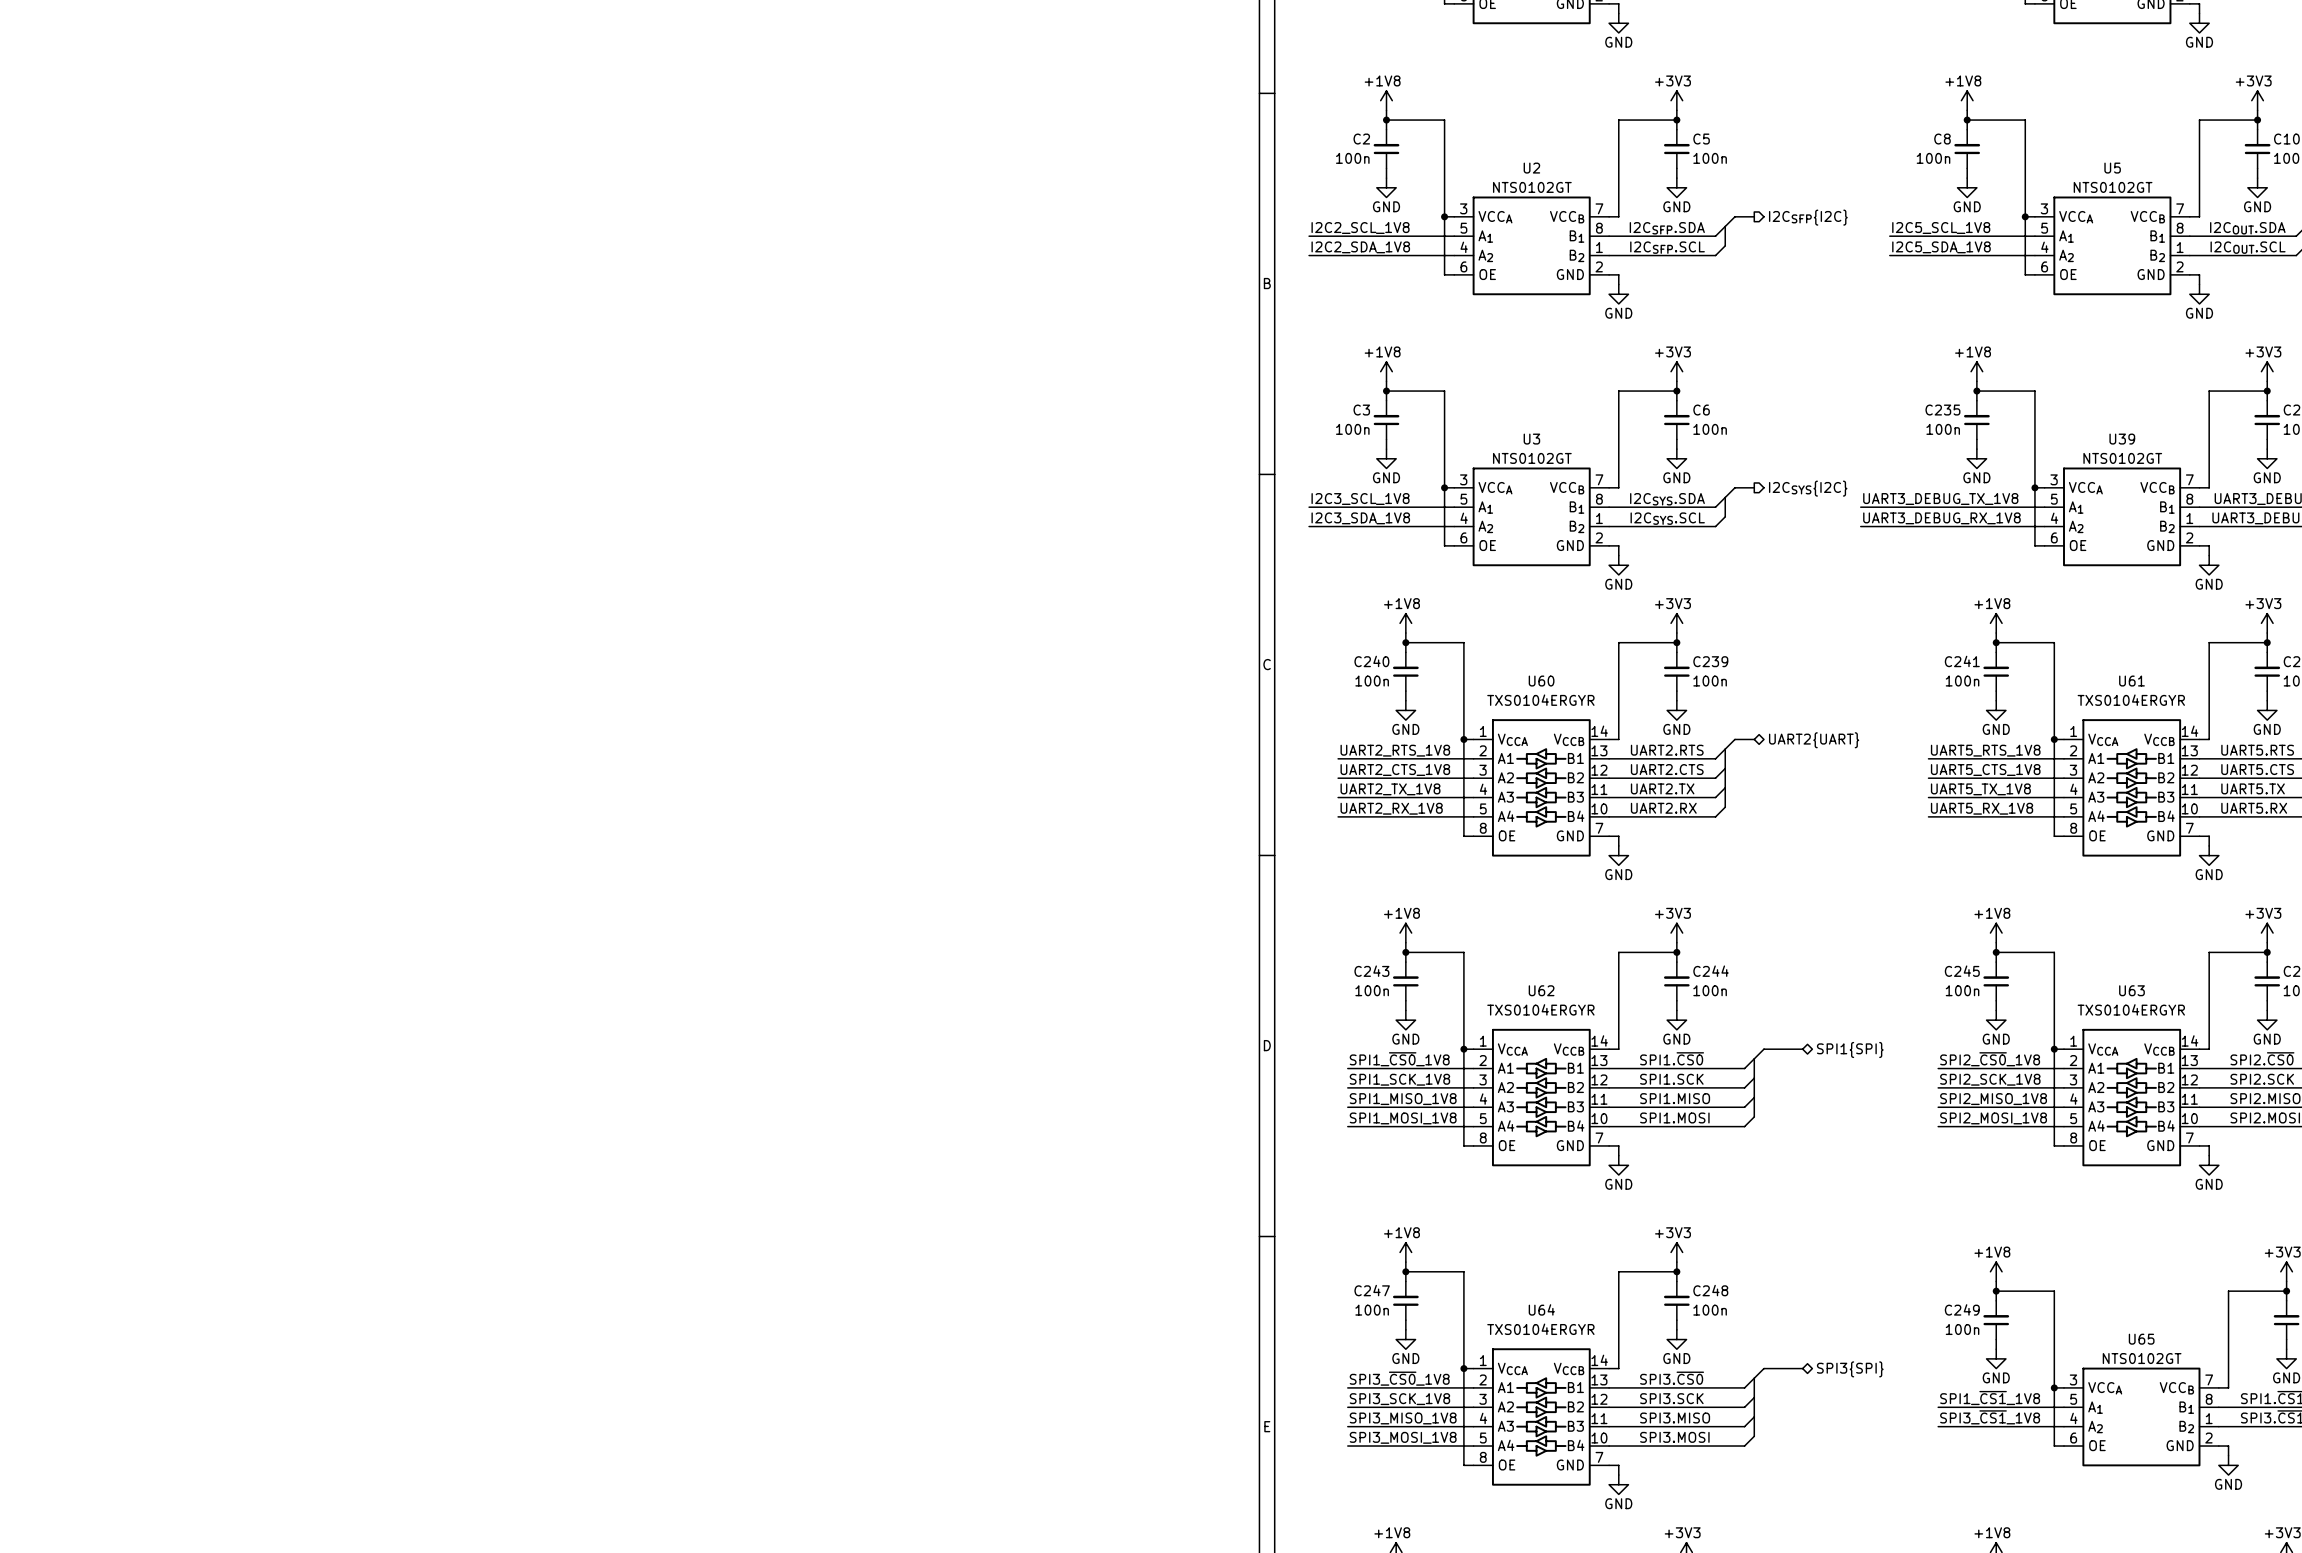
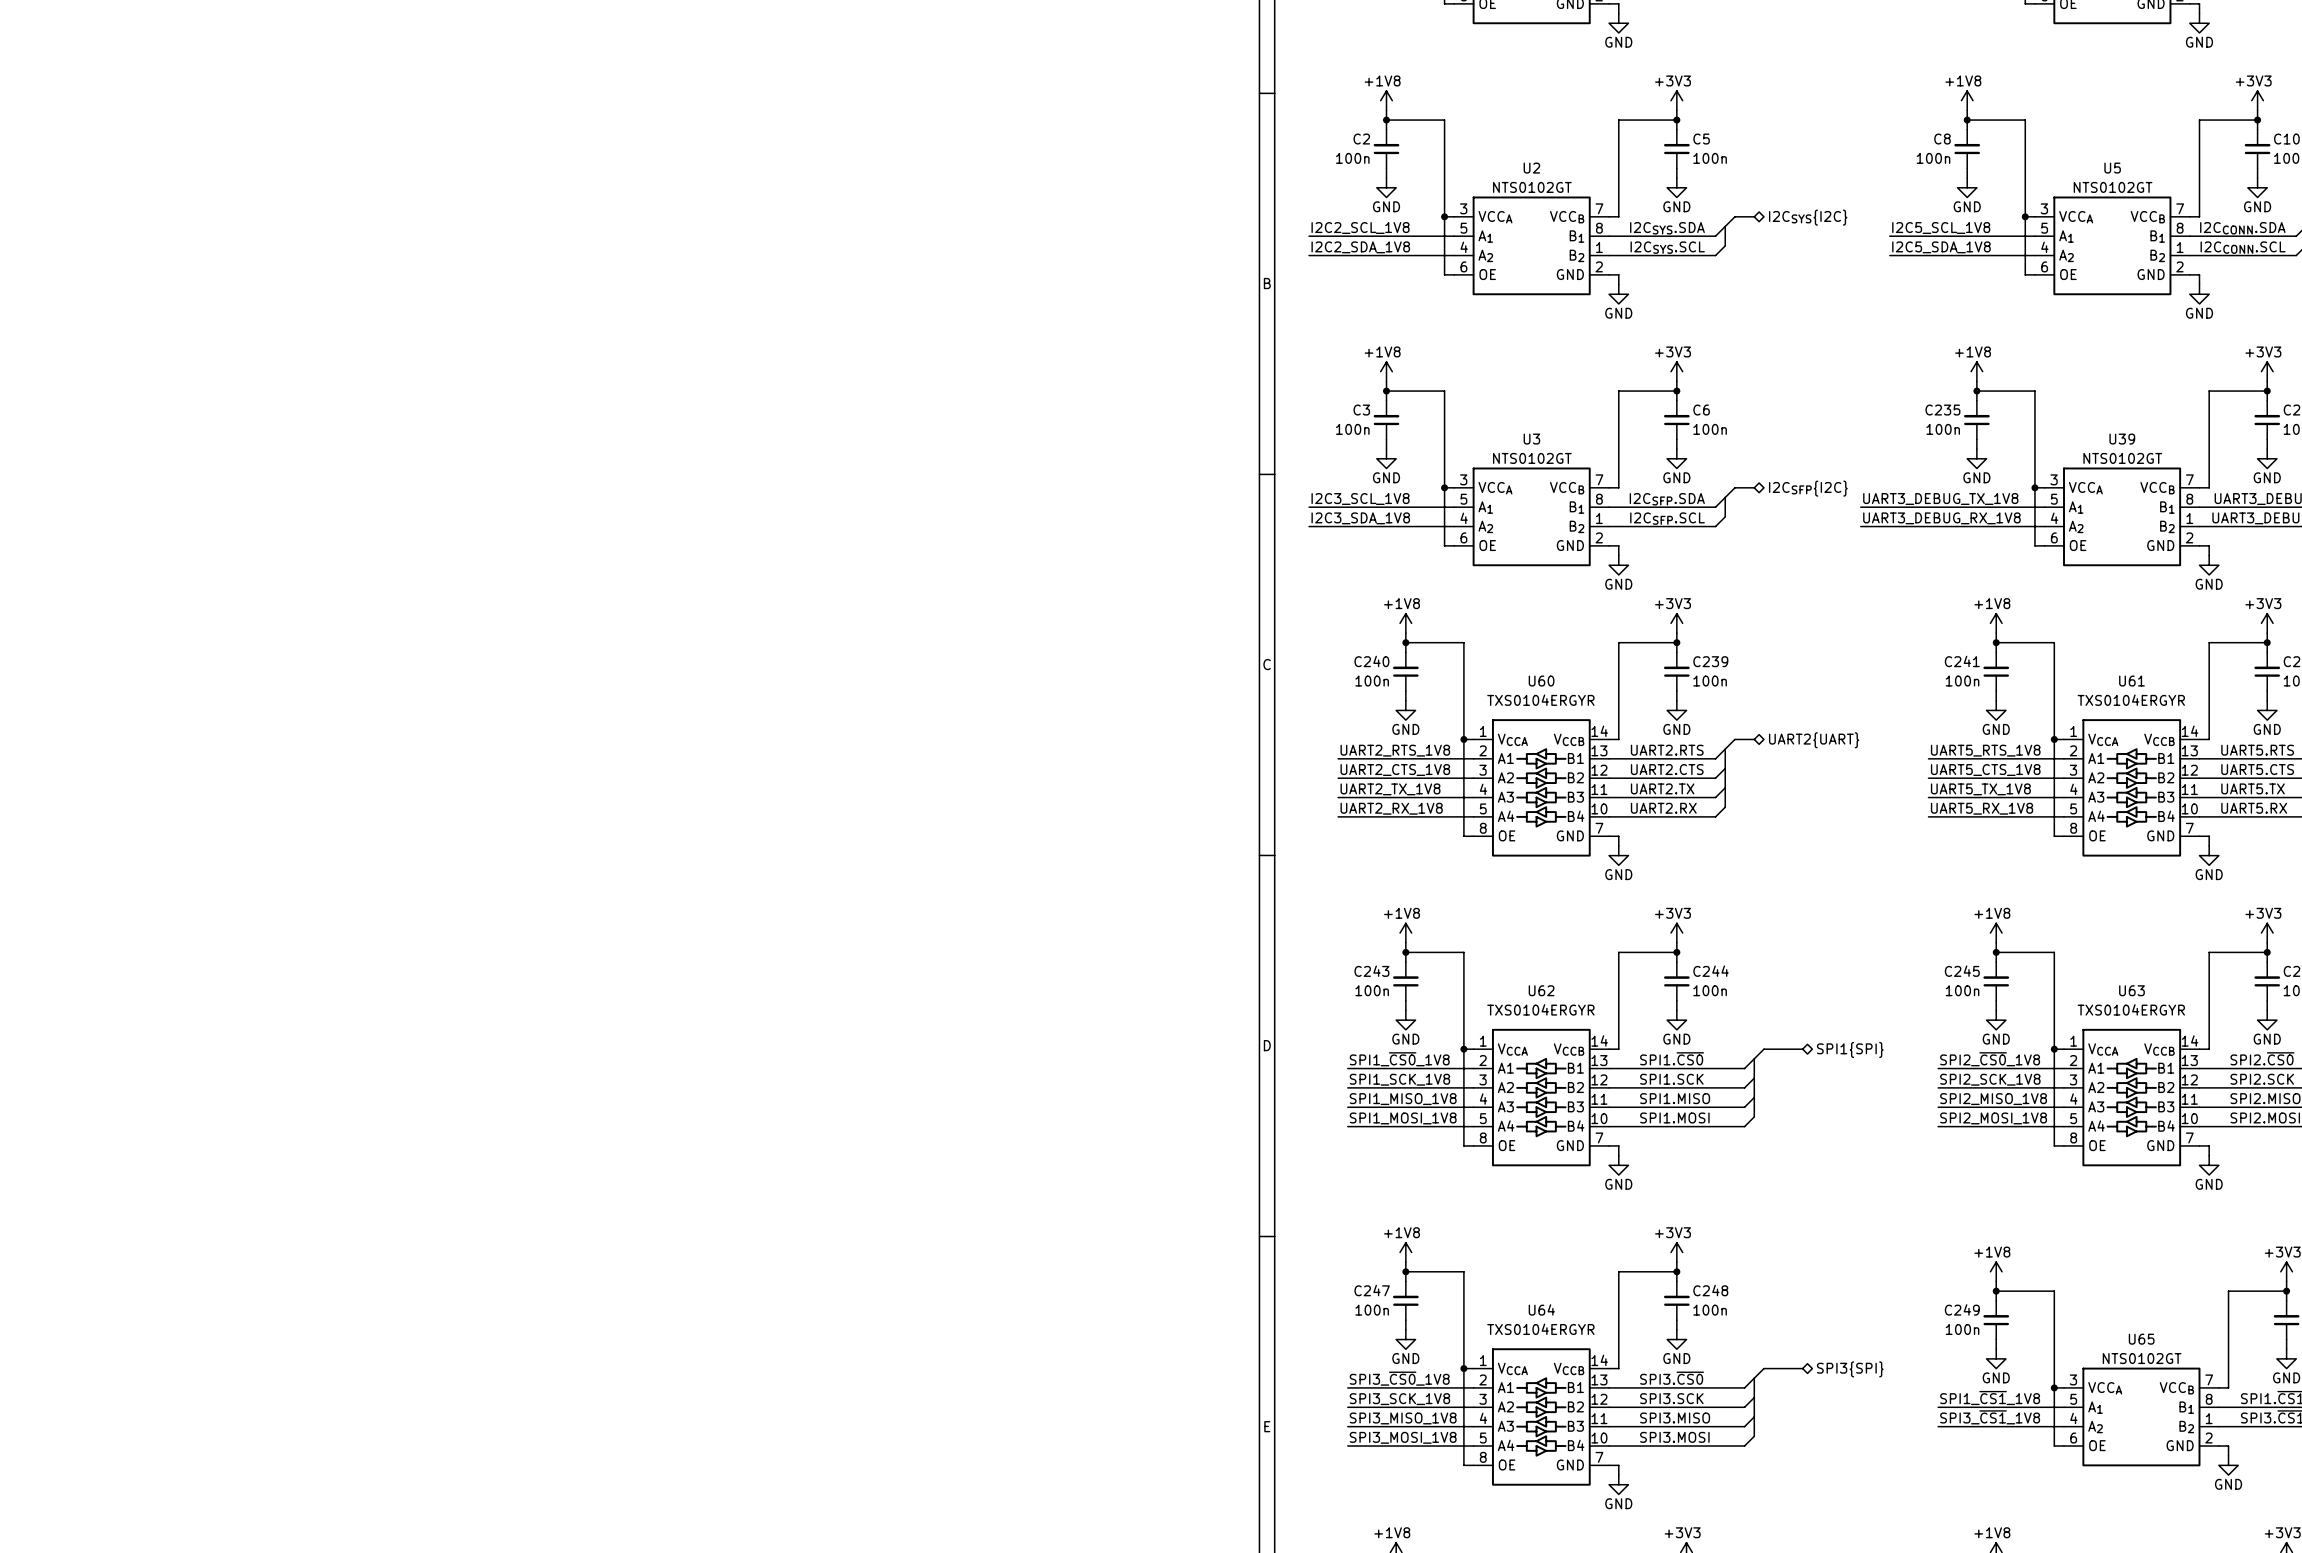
hierarchical label shape: output (1808, 217) -> bidirectional (1808, 217)
hierarchical label: I2CSFP{I2C} (1808, 217) -> I2CSYS{I2C} (1808, 217)
label: I2CSFP.SDA (1667, 228) -> I2CSYS.SDA (1667, 228)
label: I2COUT.SDA (2247, 228) -> I2CCONN.SDA (2242, 228)
label: I2CSFP.SCL (1667, 247) -> I2CSYS.SCL (1667, 247)
label: I2COUT.SCL (2248, 247) -> I2CCONN.SCL (2243, 247)
hierarchical label shape: output (1808, 488) -> bidirectional (1808, 488)
hierarchical label: I2CSYS{I2C} (1808, 488) -> I2CSFP{I2C} (1808, 488)
label: I2CSYS.SDA (1667, 499) -> I2CSFP.SDA (1667, 499)
label: I2CSYS.SCL (1667, 518) -> I2CSFP.SCL (1667, 518)

